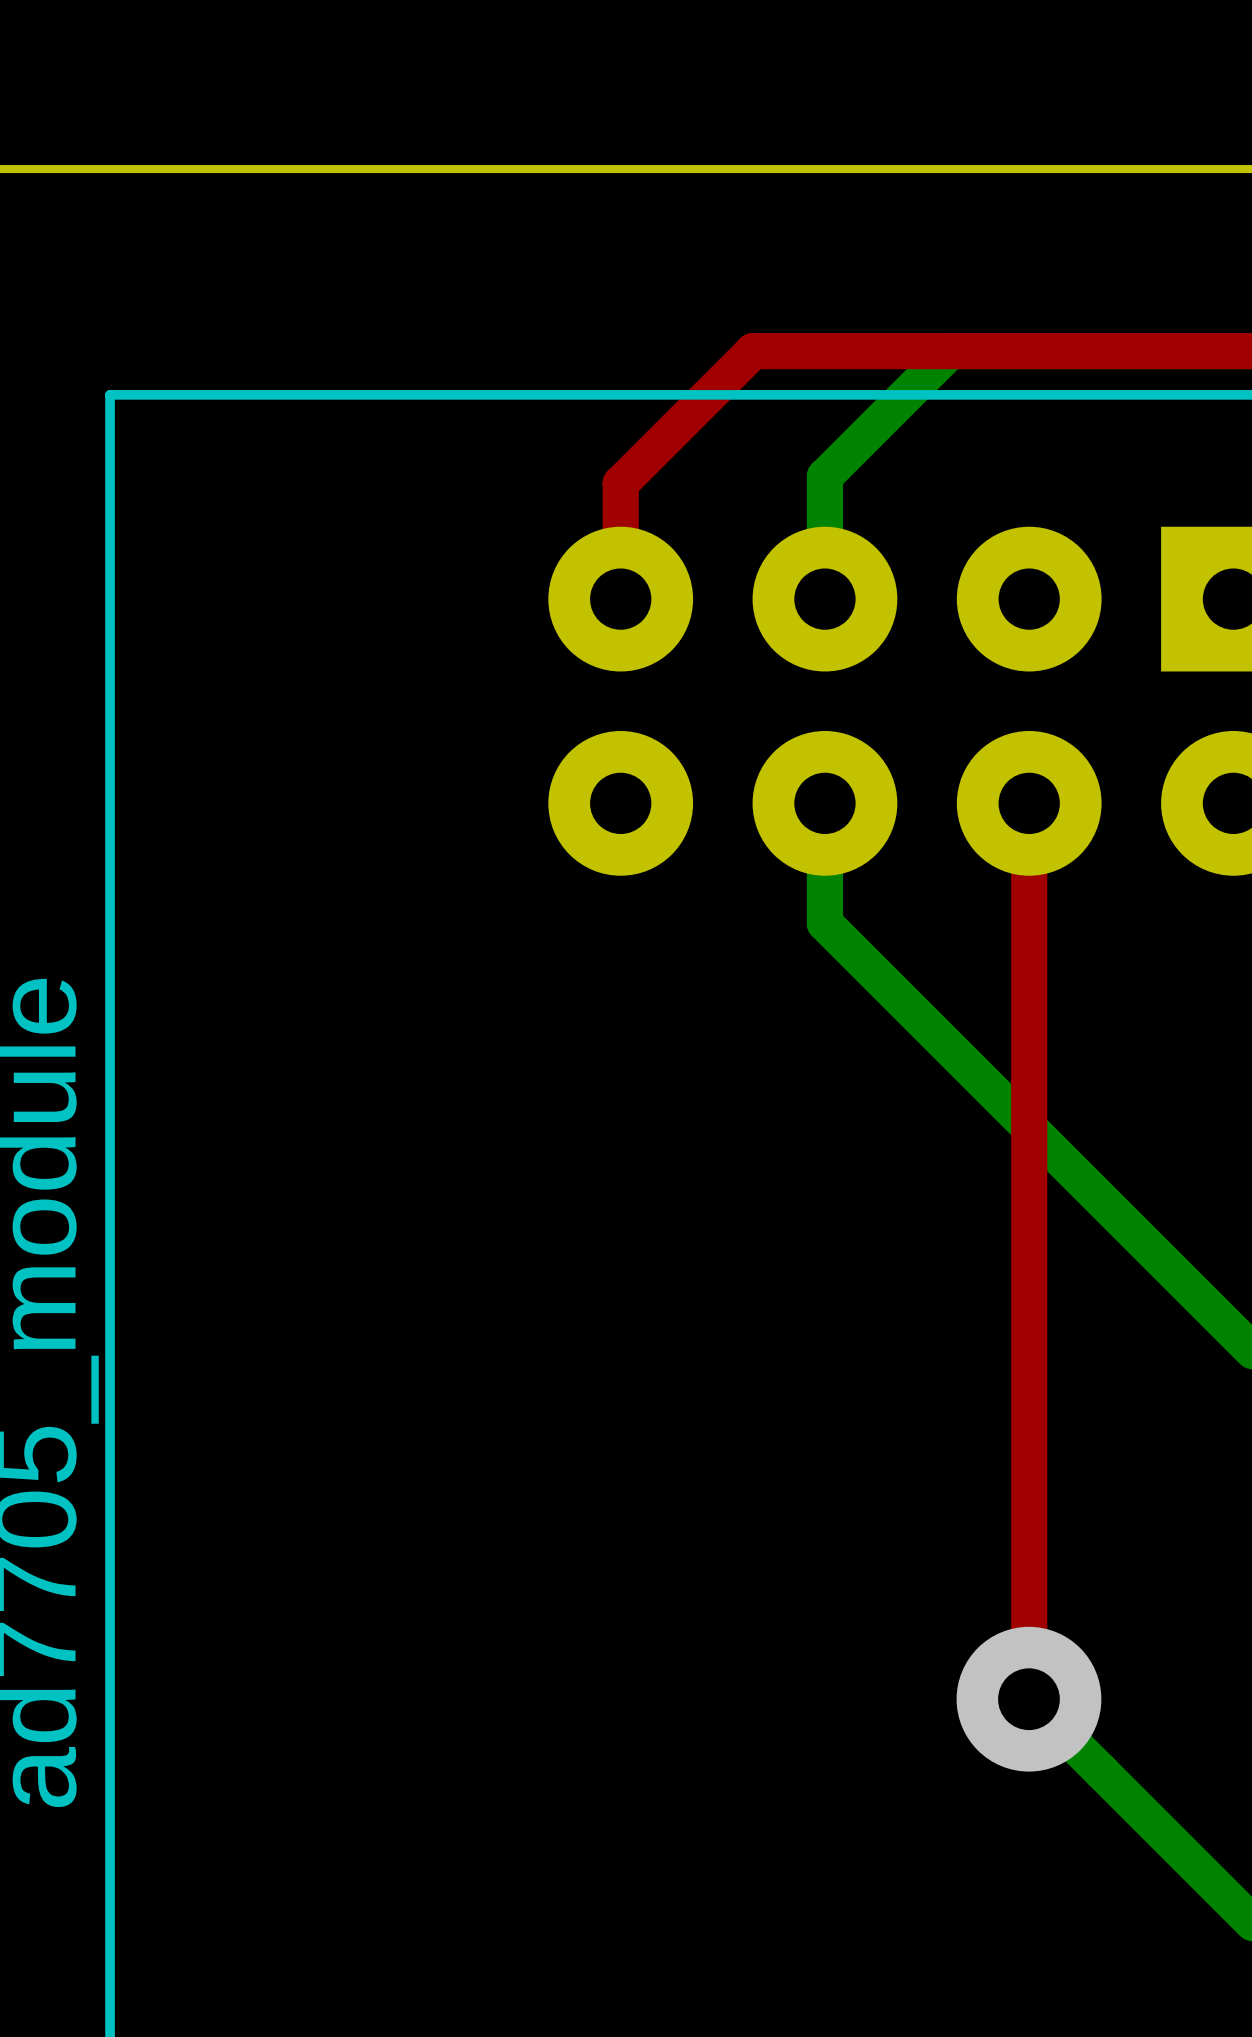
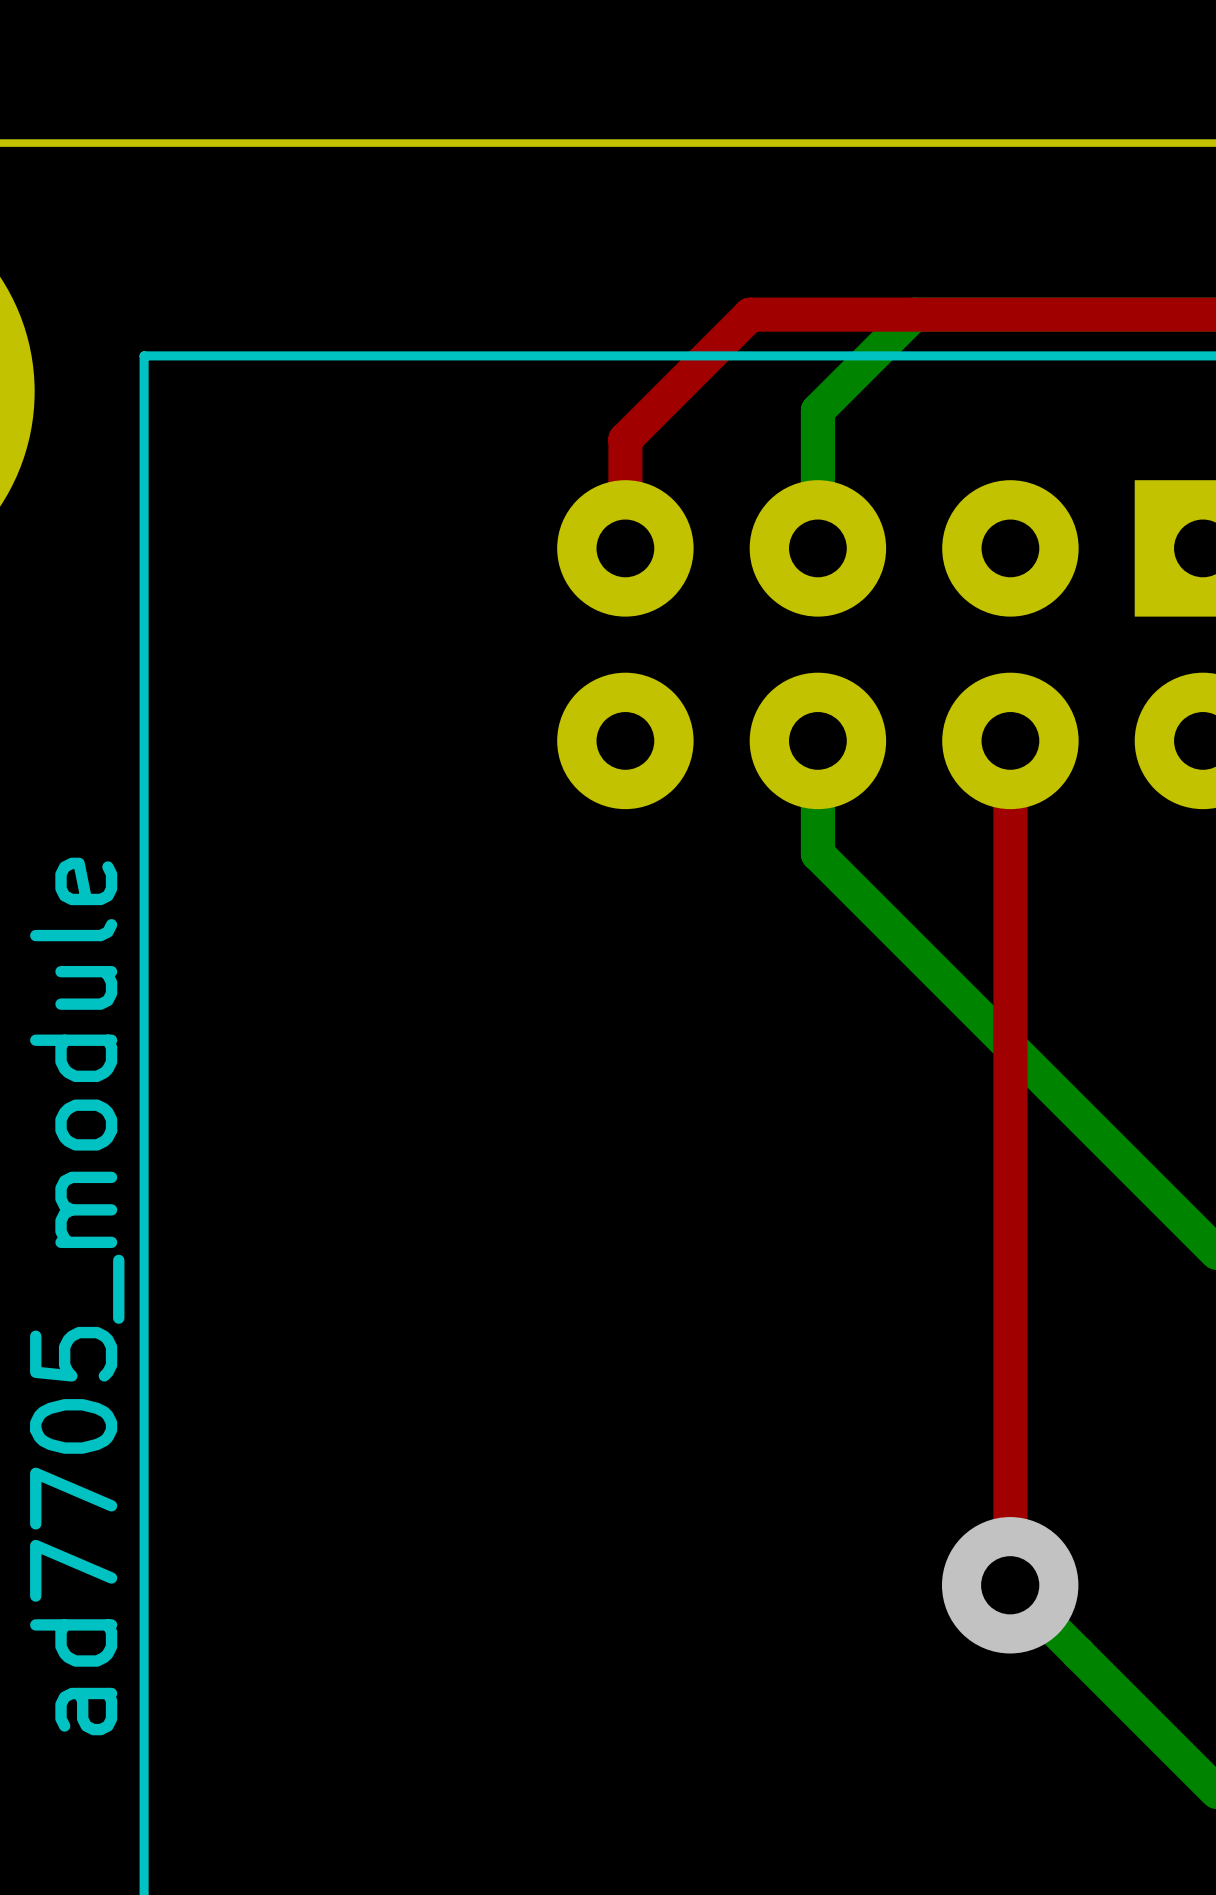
bottom track: (950, 351) (824, 476) -> (936, 314) (913, 314) (817, 410) (817, 432)

